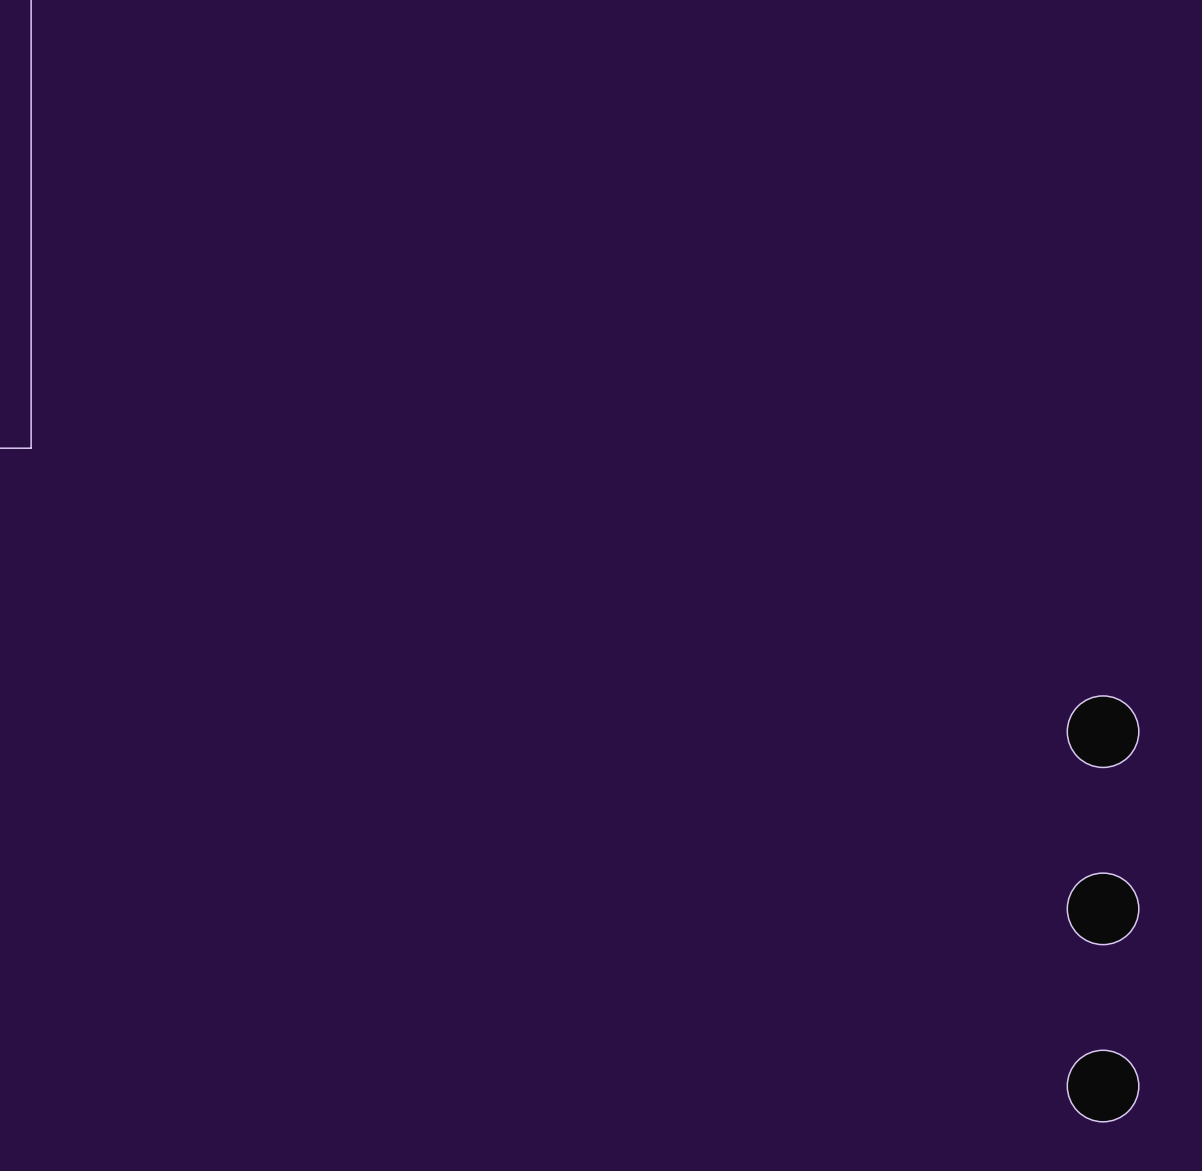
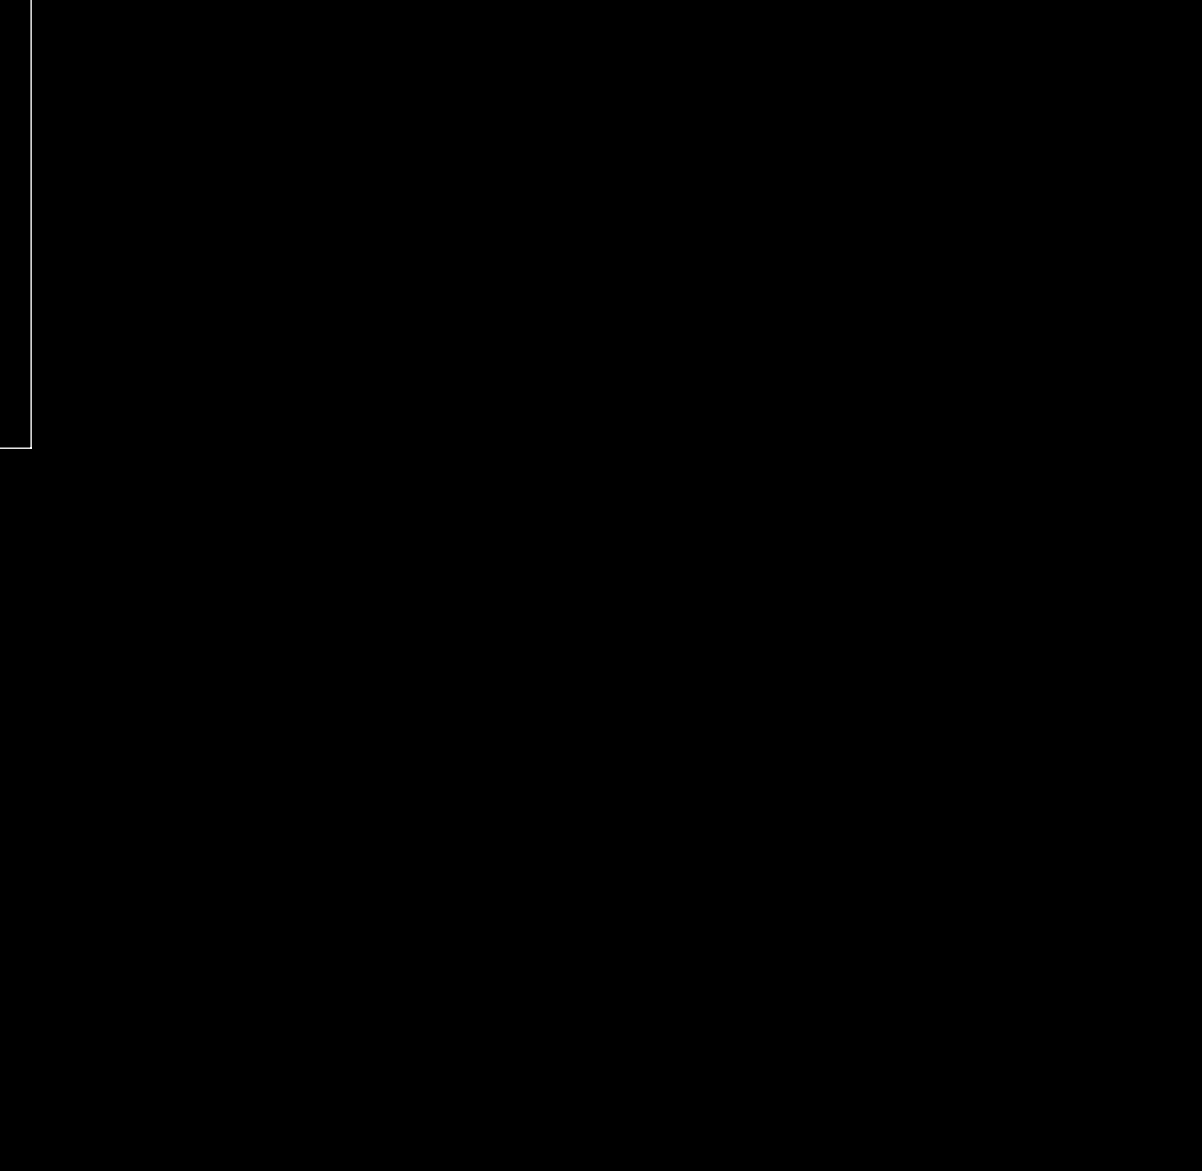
part: (1103, 731) -> none
part: (1103, 908) -> none
part: (1103, 1086) -> none

